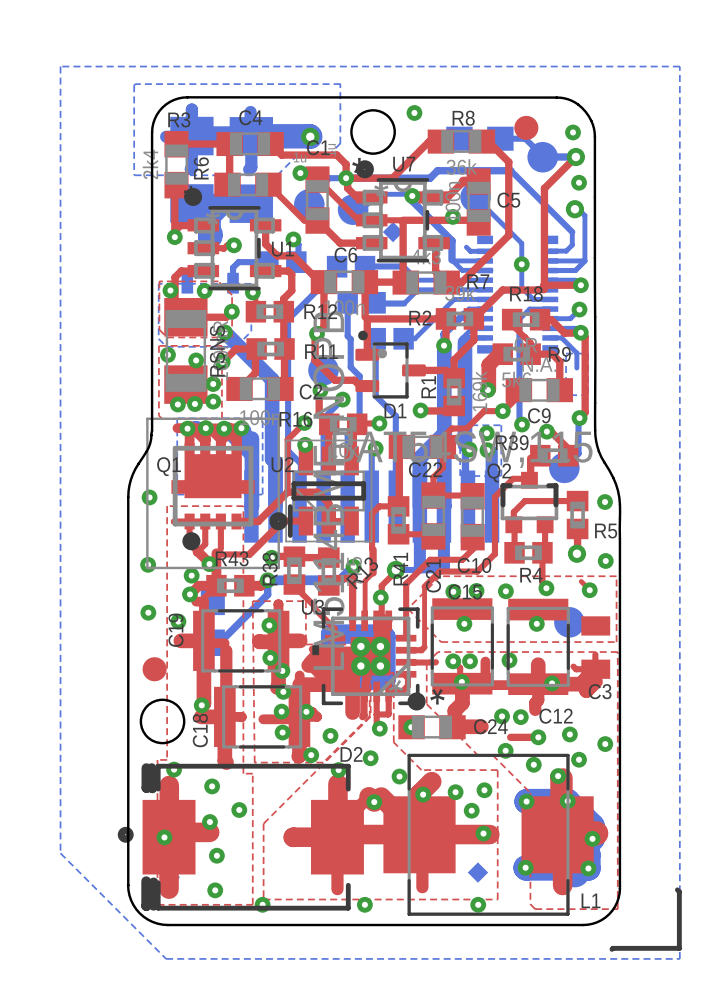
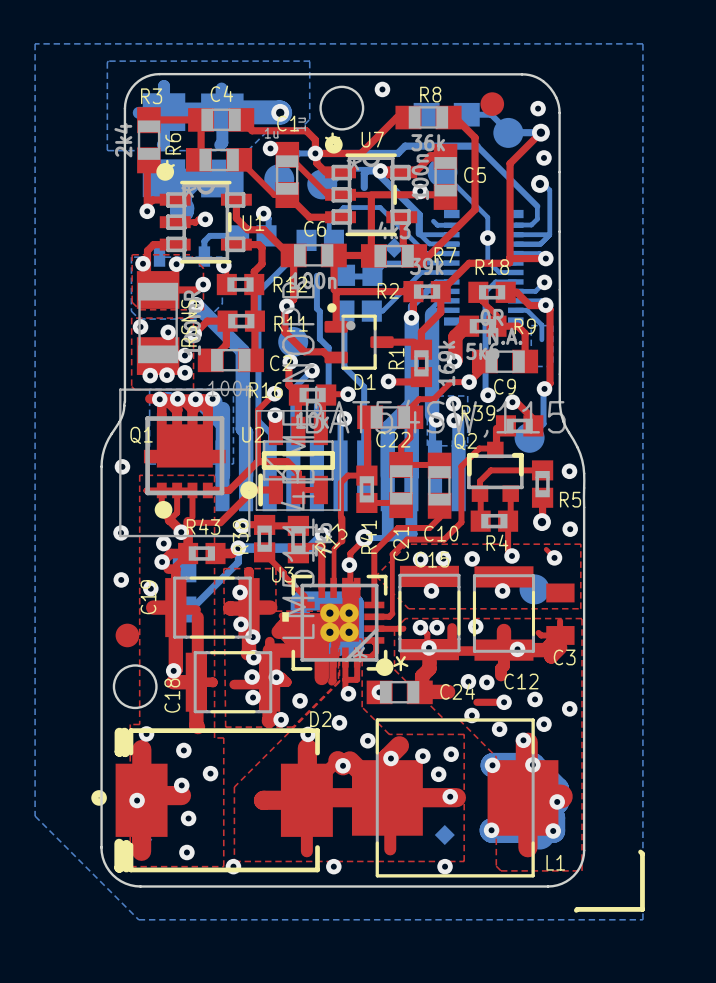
bottom track: none -> (380, 170) (366, 170) (364, 173) (364, 187)
part position: (393, 232) -> (394, 247)
bottom track: (365, 266) (403, 266) (417, 280) (459, 280) -> (329, 240) (329, 221) (343, 207) (380, 207) (426, 253)
part position: (361, 302) -> (358, 275)

